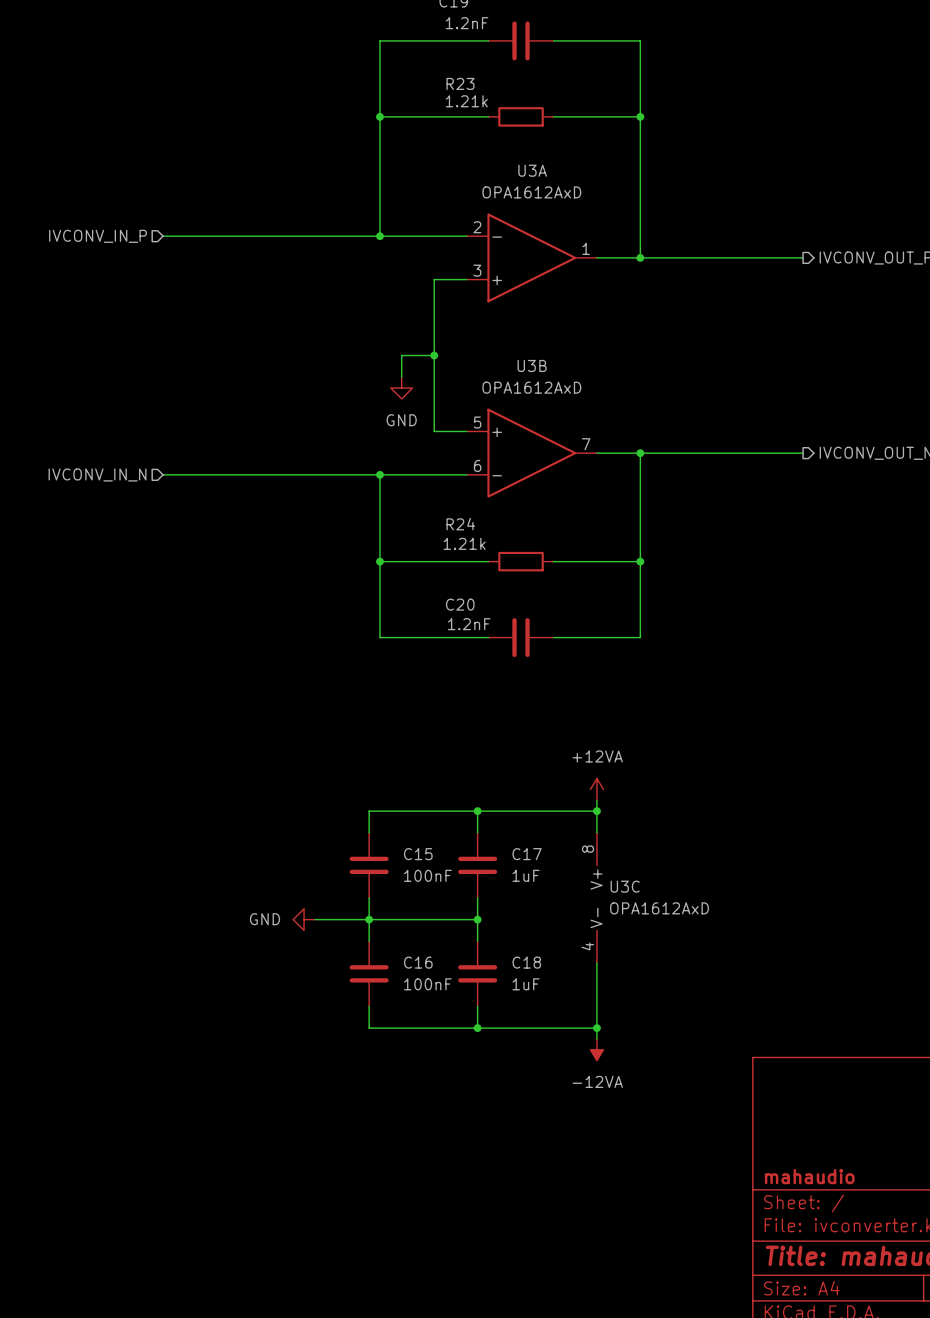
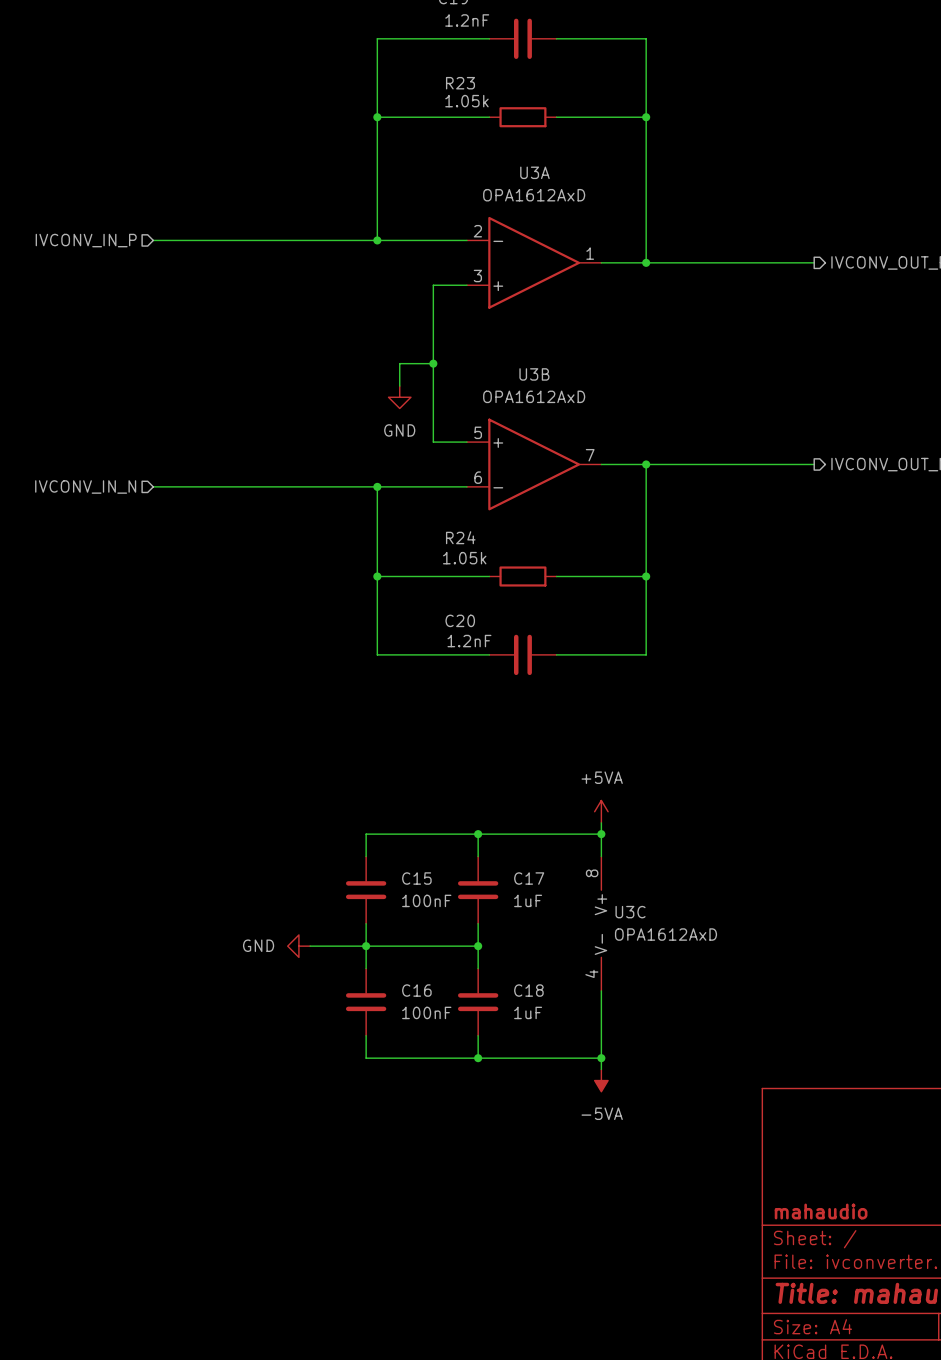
R23 value: 1.21k (466, 101) -> 1.05k (466, 101)
R24 value: 1.21k (464, 543) -> 1.05k (464, 558)
power symbol: +12VA (596, 789) -> +5VA (601, 811)
power symbol: -12VA (596, 1049) -> -5VA (601, 1080)

